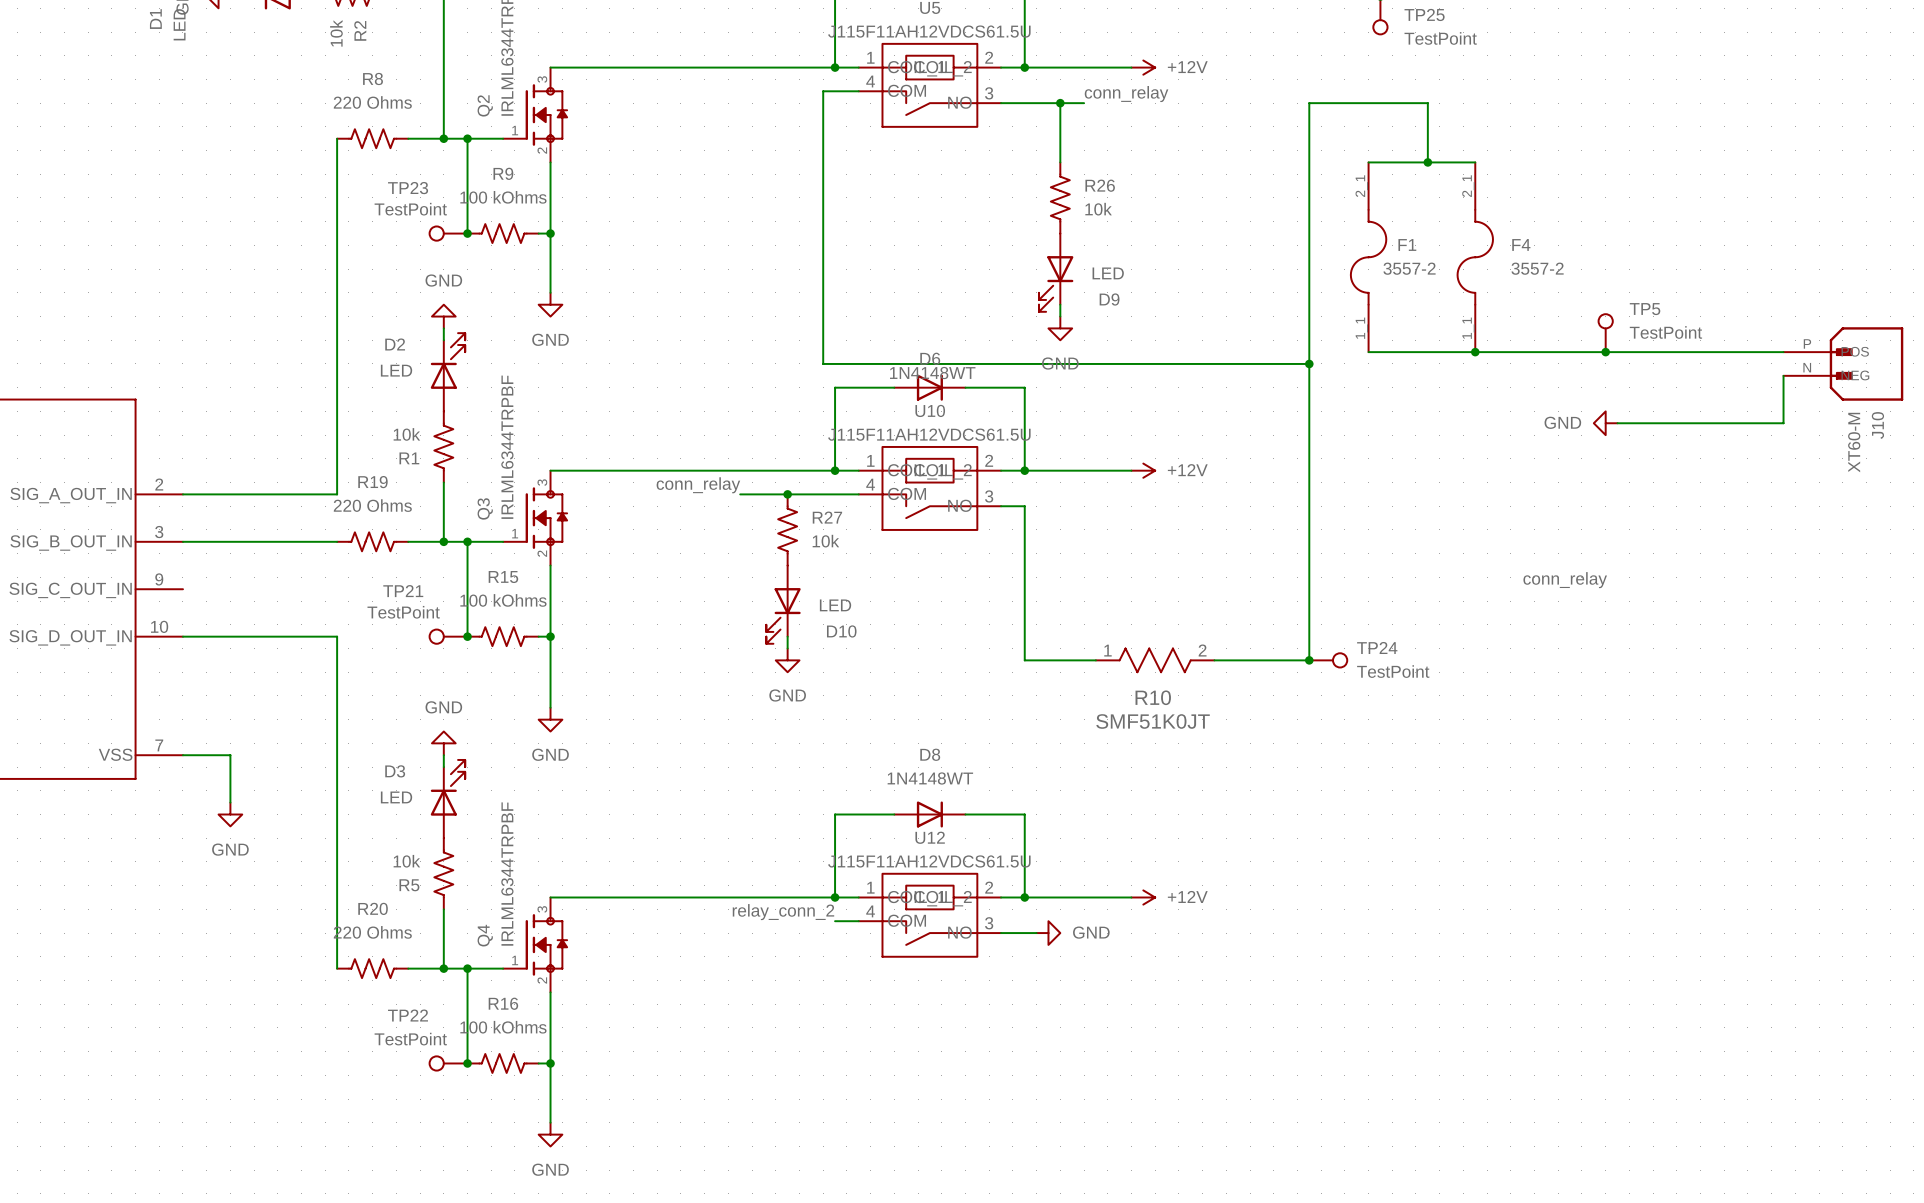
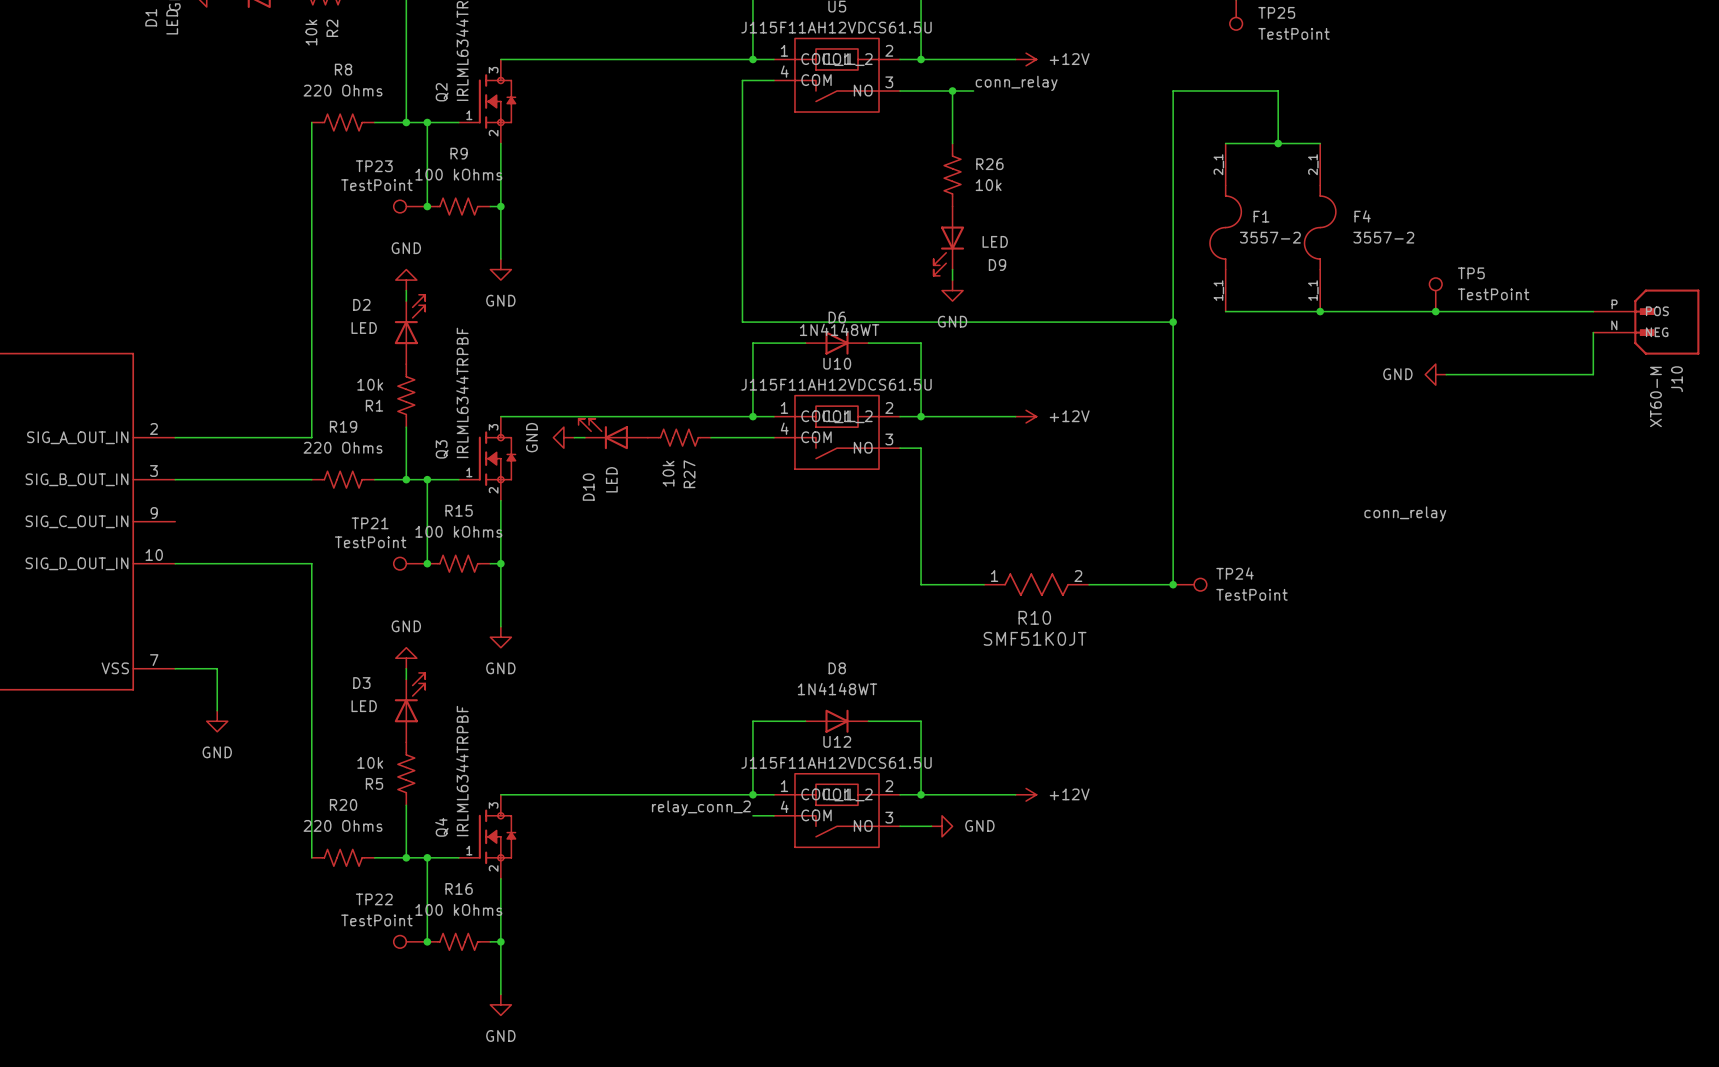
label: conn_relay (698, 485) -> none
power symbol: none -> GND (563, 437)
wire: none -> (574, 437) (584, 437)
junction: (787, 494) -> none
R27 rotation: 0° (787, 529) -> 90° clockwise (679, 437)
R27 position: (787, 529) -> (679, 437)
D10 position: (783, 604) -> (613, 433)
D10 rotation: 0° (783, 615) -> 90° clockwise (603, 433)
wire: (787, 636) (787, 648) -> none
power symbol: GND (787, 660) -> none

